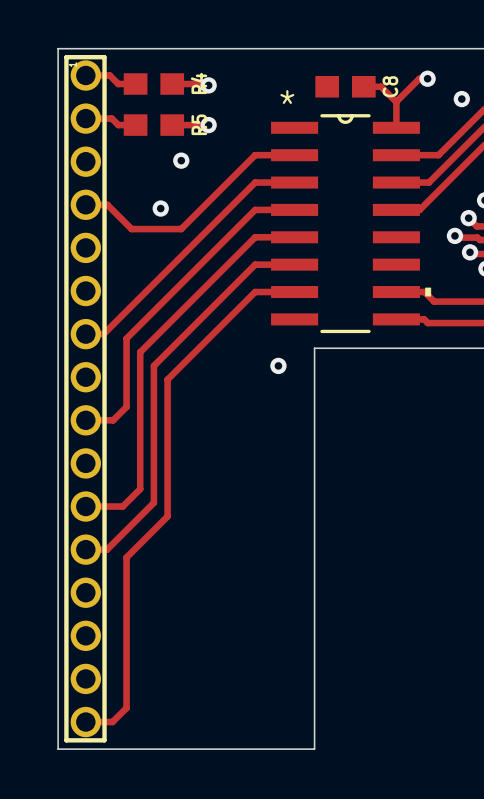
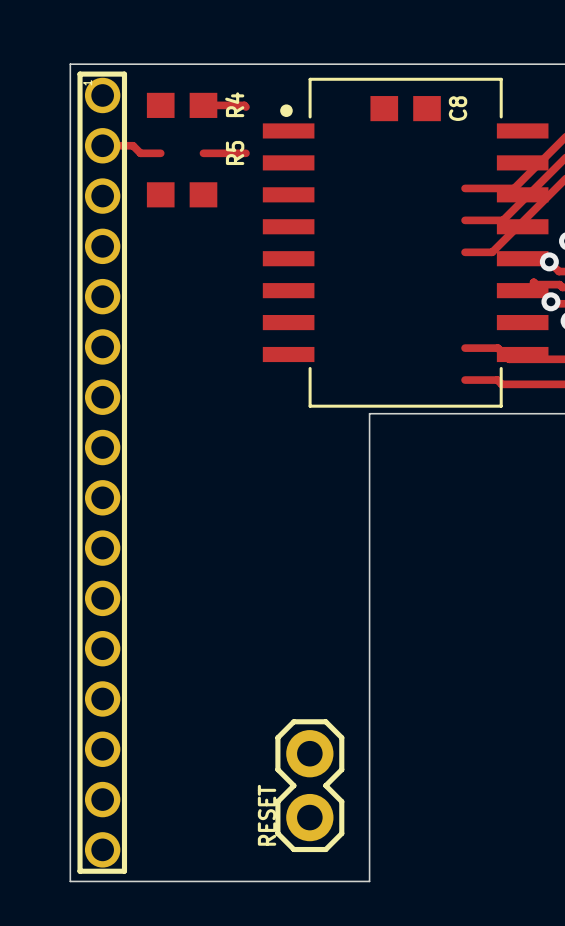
track: (85, 75) (109, 75) (118, 84) (135, 84) -> none
track: (427, 78) (419, 78) (396, 101) (396, 127) -> none
via: (427, 78) -> none
via: (208, 85) -> none
track: (363, 86) (381, 86) (396, 102) -> none
via: (461, 99) -> none
R5 position: (153, 125) -> (182, 194)
via: (208, 125) -> none
track: (294, 155) (255, 155) (181, 229) (131, 229) (107, 204) (85, 204) -> none
via: (181, 160) -> none
track: (294, 182) (255, 182) (103, 334) (85, 334) -> none
part: none -> (405, 242)
via: (160, 208) -> none
track: (294, 209) (255, 209) (126, 338) (126, 406) (113, 420) (85, 420) -> none
part: (351, 223) -> none
via: (454, 235) -> none
track: (294, 237) (255, 237) (140, 352) (140, 489) (122, 506) (85, 506) -> none
track: (294, 264) (255, 264) (153, 365) (153, 502) (107, 549) (85, 549) -> none
track: (294, 292) (255, 292) (167, 379) (167, 516) (126, 557) (126, 708) (112, 722) (85, 722) -> none
via: (278, 365) -> none
RESET: none -> (309, 785)

